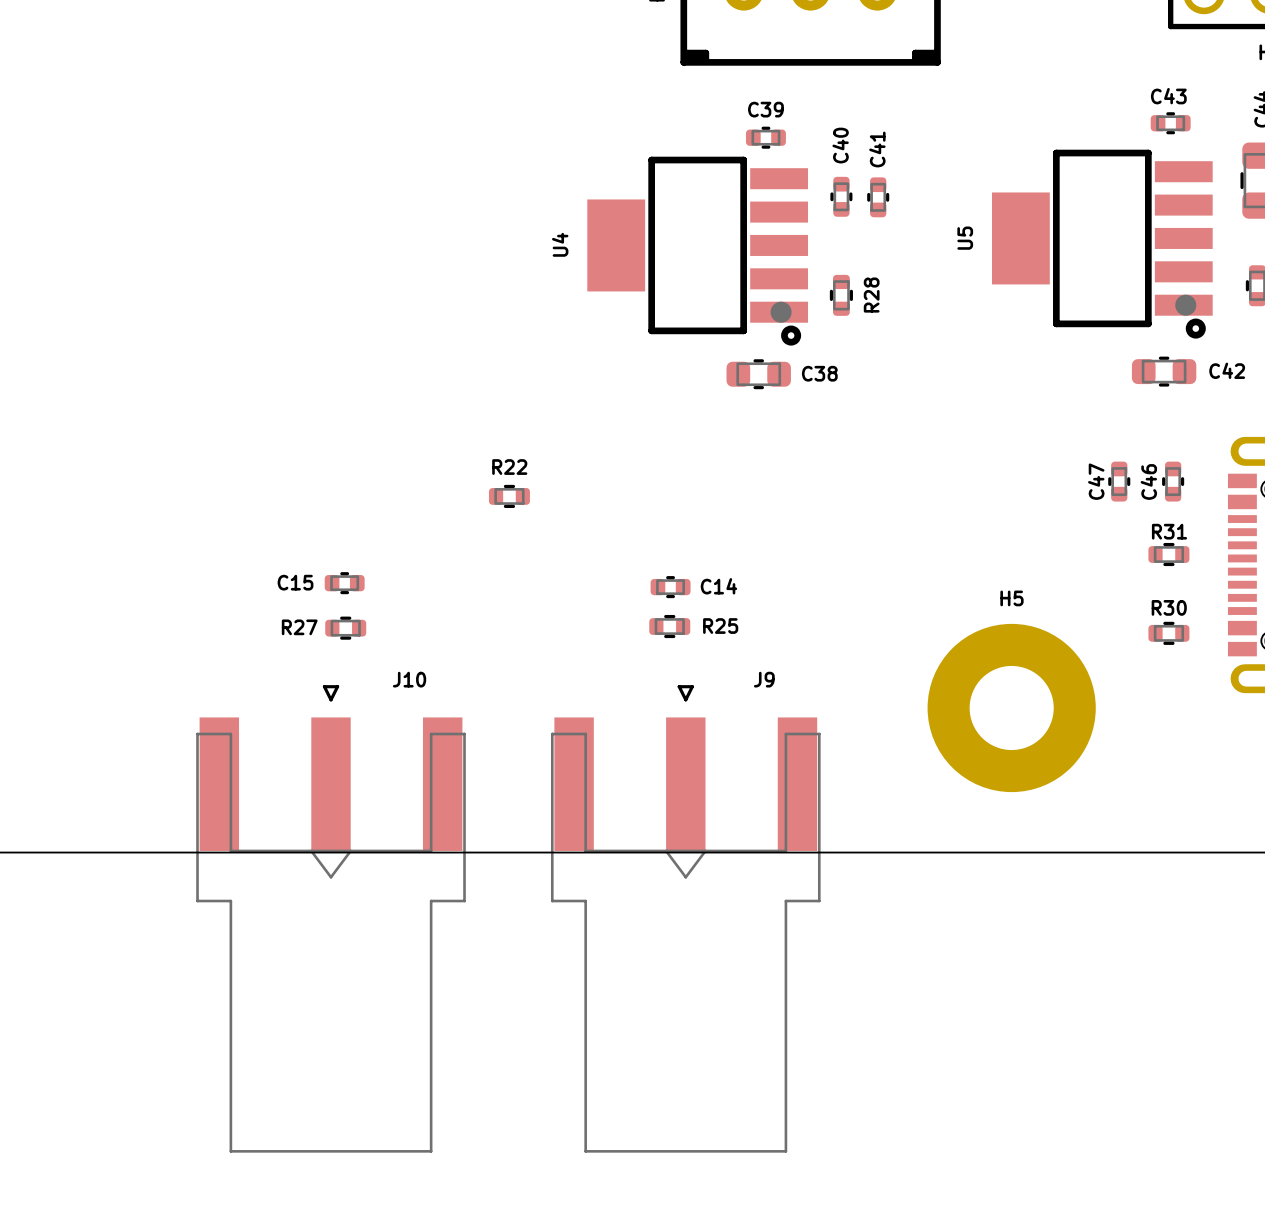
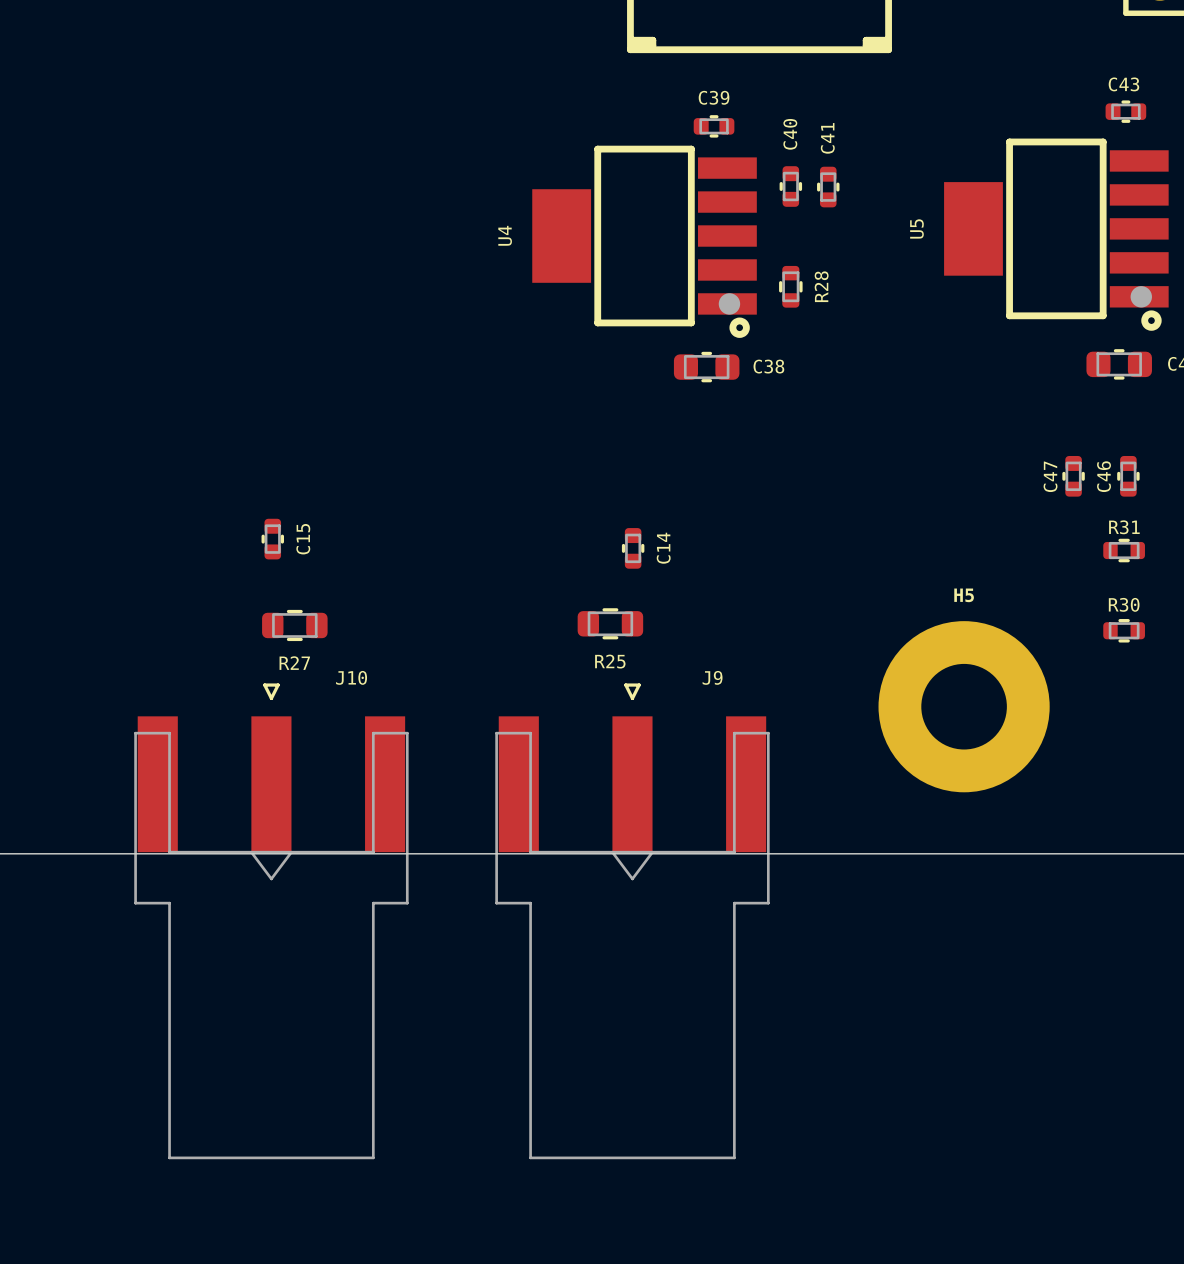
R22: (509, 496) -> none
C15 name position: C15 (295, 582) -> C15 (303, 539)
C15 rotation: 0° (344, 583) -> 90° clockwise (272, 539)
C15 position: (344, 583) -> (272, 539)
C14 rotation: 0° (670, 587) -> 90° clockwise (633, 548)
C14 position: (670, 587) -> (633, 548)
R25 footprint: [649, 614, 691, 639] -> [577, 608, 644, 640]
R27 footprint: [325, 616, 367, 640] -> [262, 609, 328, 642]
R25 name position: R25 (720, 626) -> R25 (610, 661)
R27 name position: R27 (299, 627) -> R27 (294, 663)

